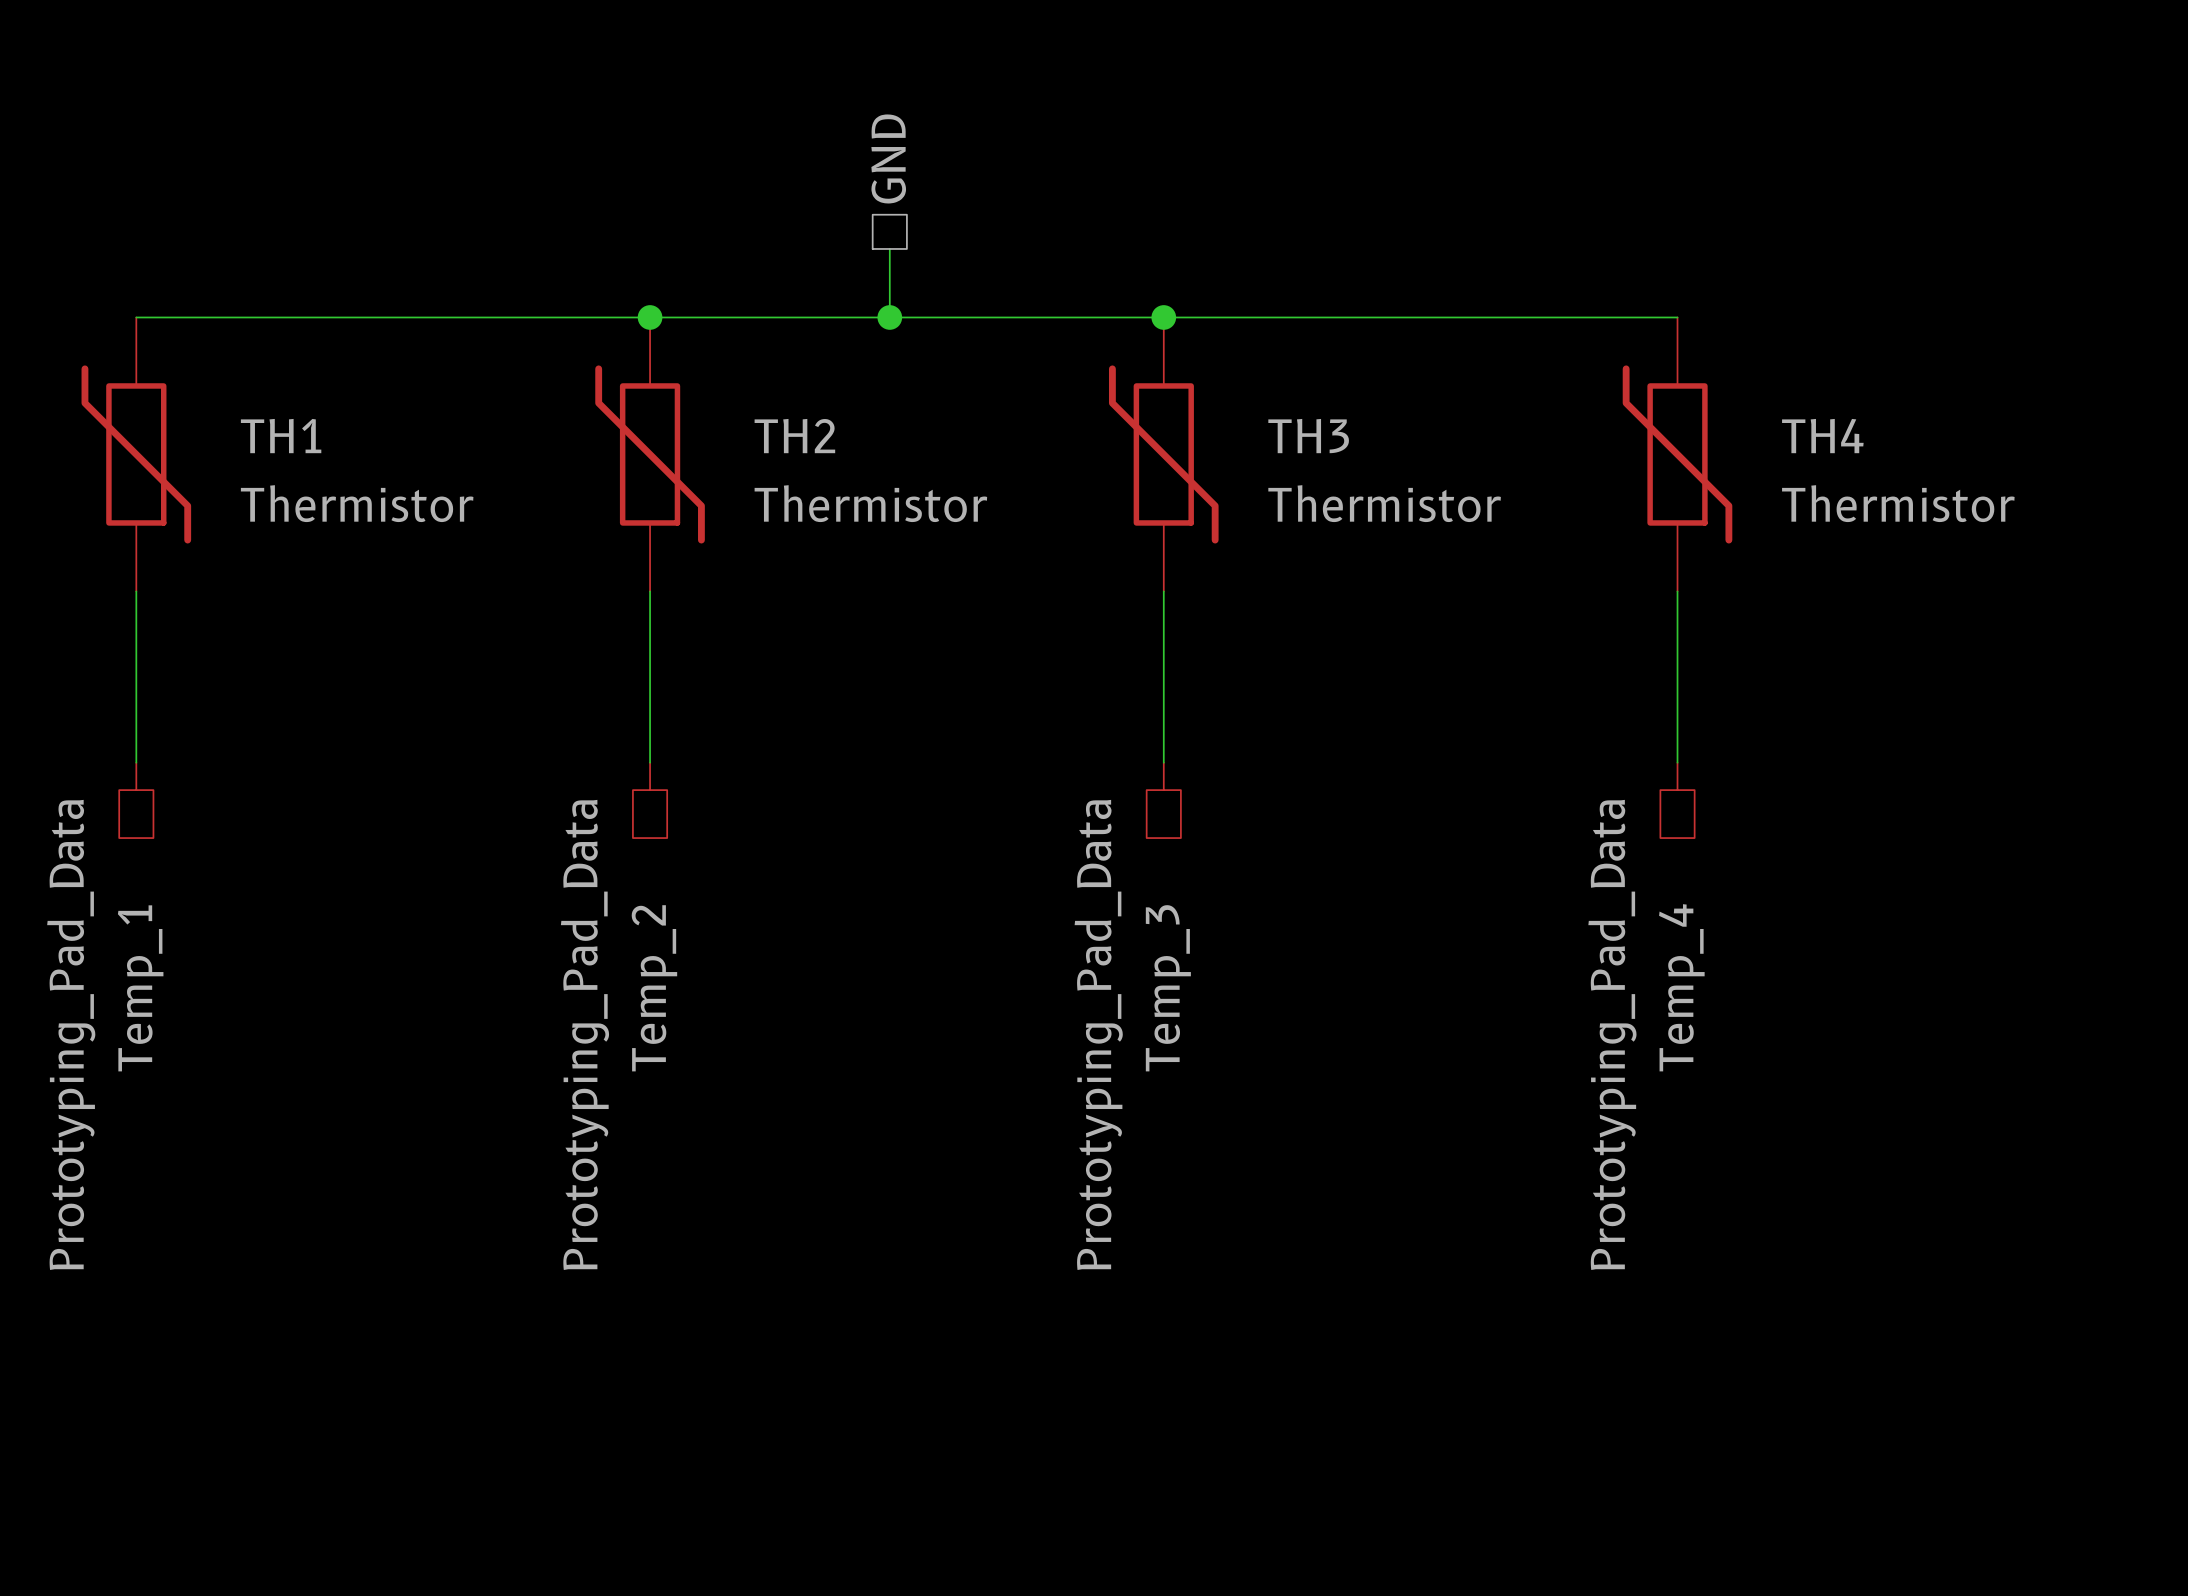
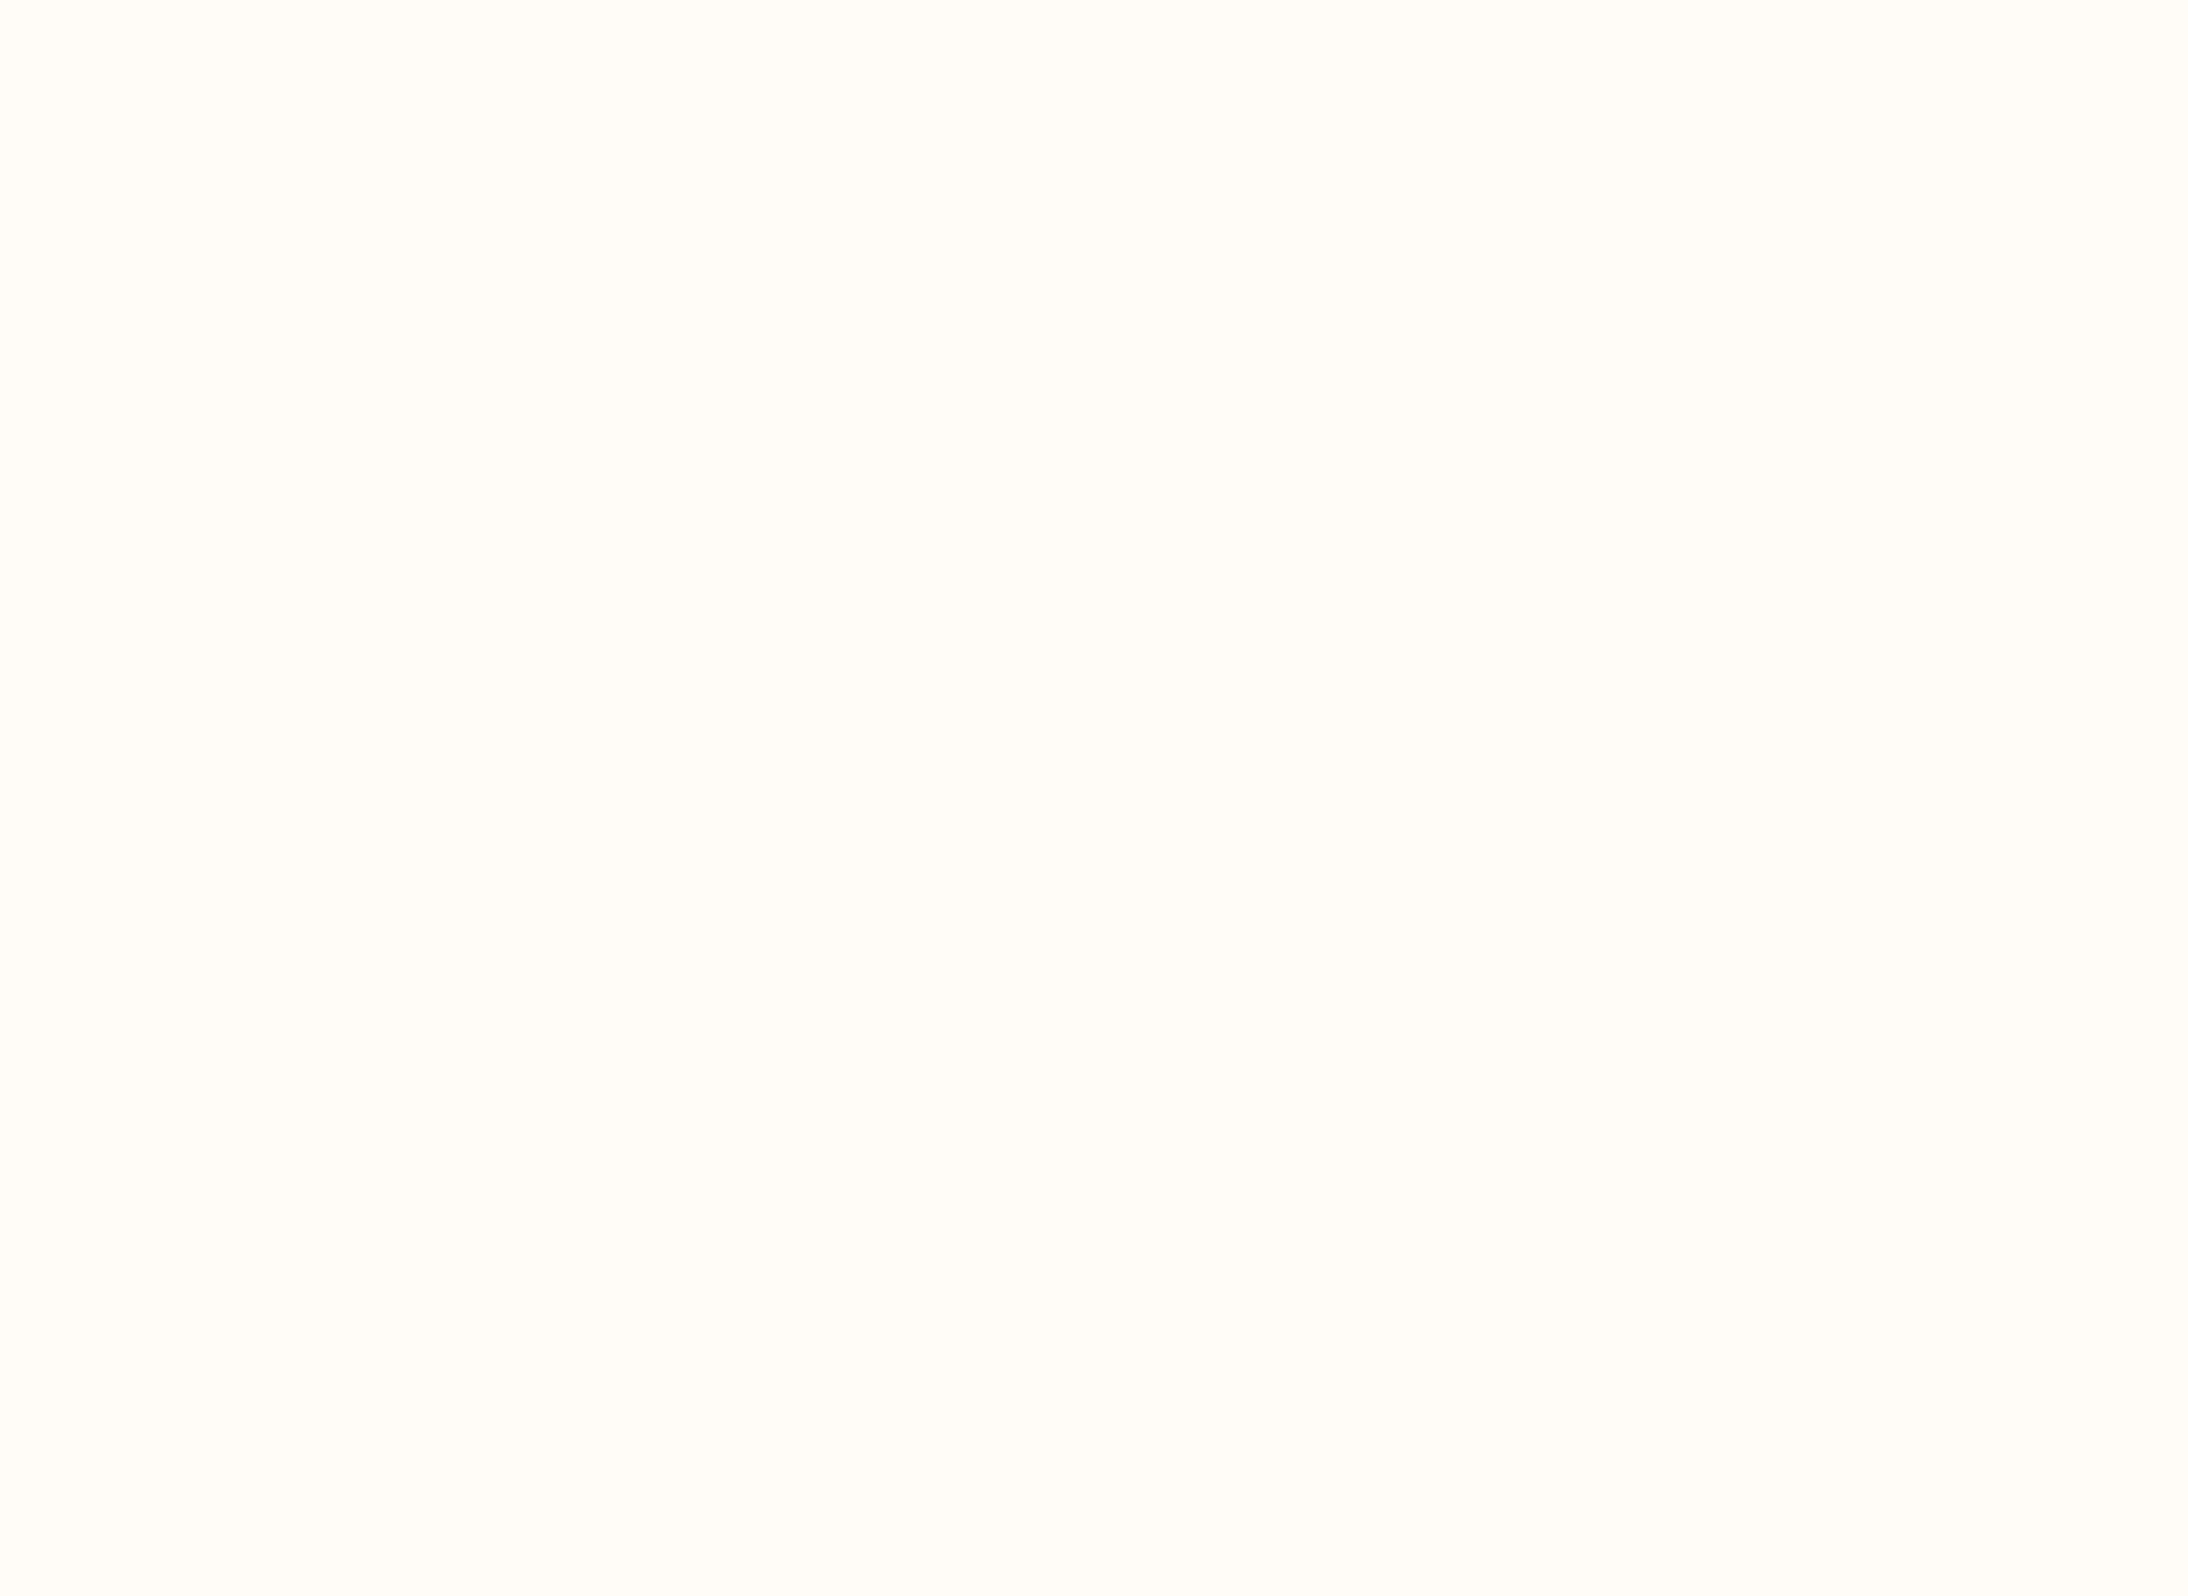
hierarchical label: GND (888, 158) -> none
wire: (889, 248) (889, 317) -> none
wire: (136, 317) (1677, 317) -> none
junction: (650, 317) -> none
junction: (889, 317) -> none
junction: (1163, 317) -> none
TH1: Thermistor (136, 454) -> none
TH2: Thermistor (650, 454) -> none
TH3: Thermistor (1163, 454) -> none
TH4: Thermistor (1677, 454) -> none
wire: (136, 591) (136, 762) -> none
wire: (650, 591) (650, 762) -> none
wire: (1163, 591) (1163, 762) -> none
wire: (1677, 591) (1677, 762) -> none
Temp_1: Prototyping_Pad_Data (136, 800) -> none
Temp_2: Prototyping_Pad_Data (650, 800) -> none
Temp_3: Prototyping_Pad_Data (1163, 800) -> none
Temp_4: Prototyping_Pad_Data (1677, 800) -> none

